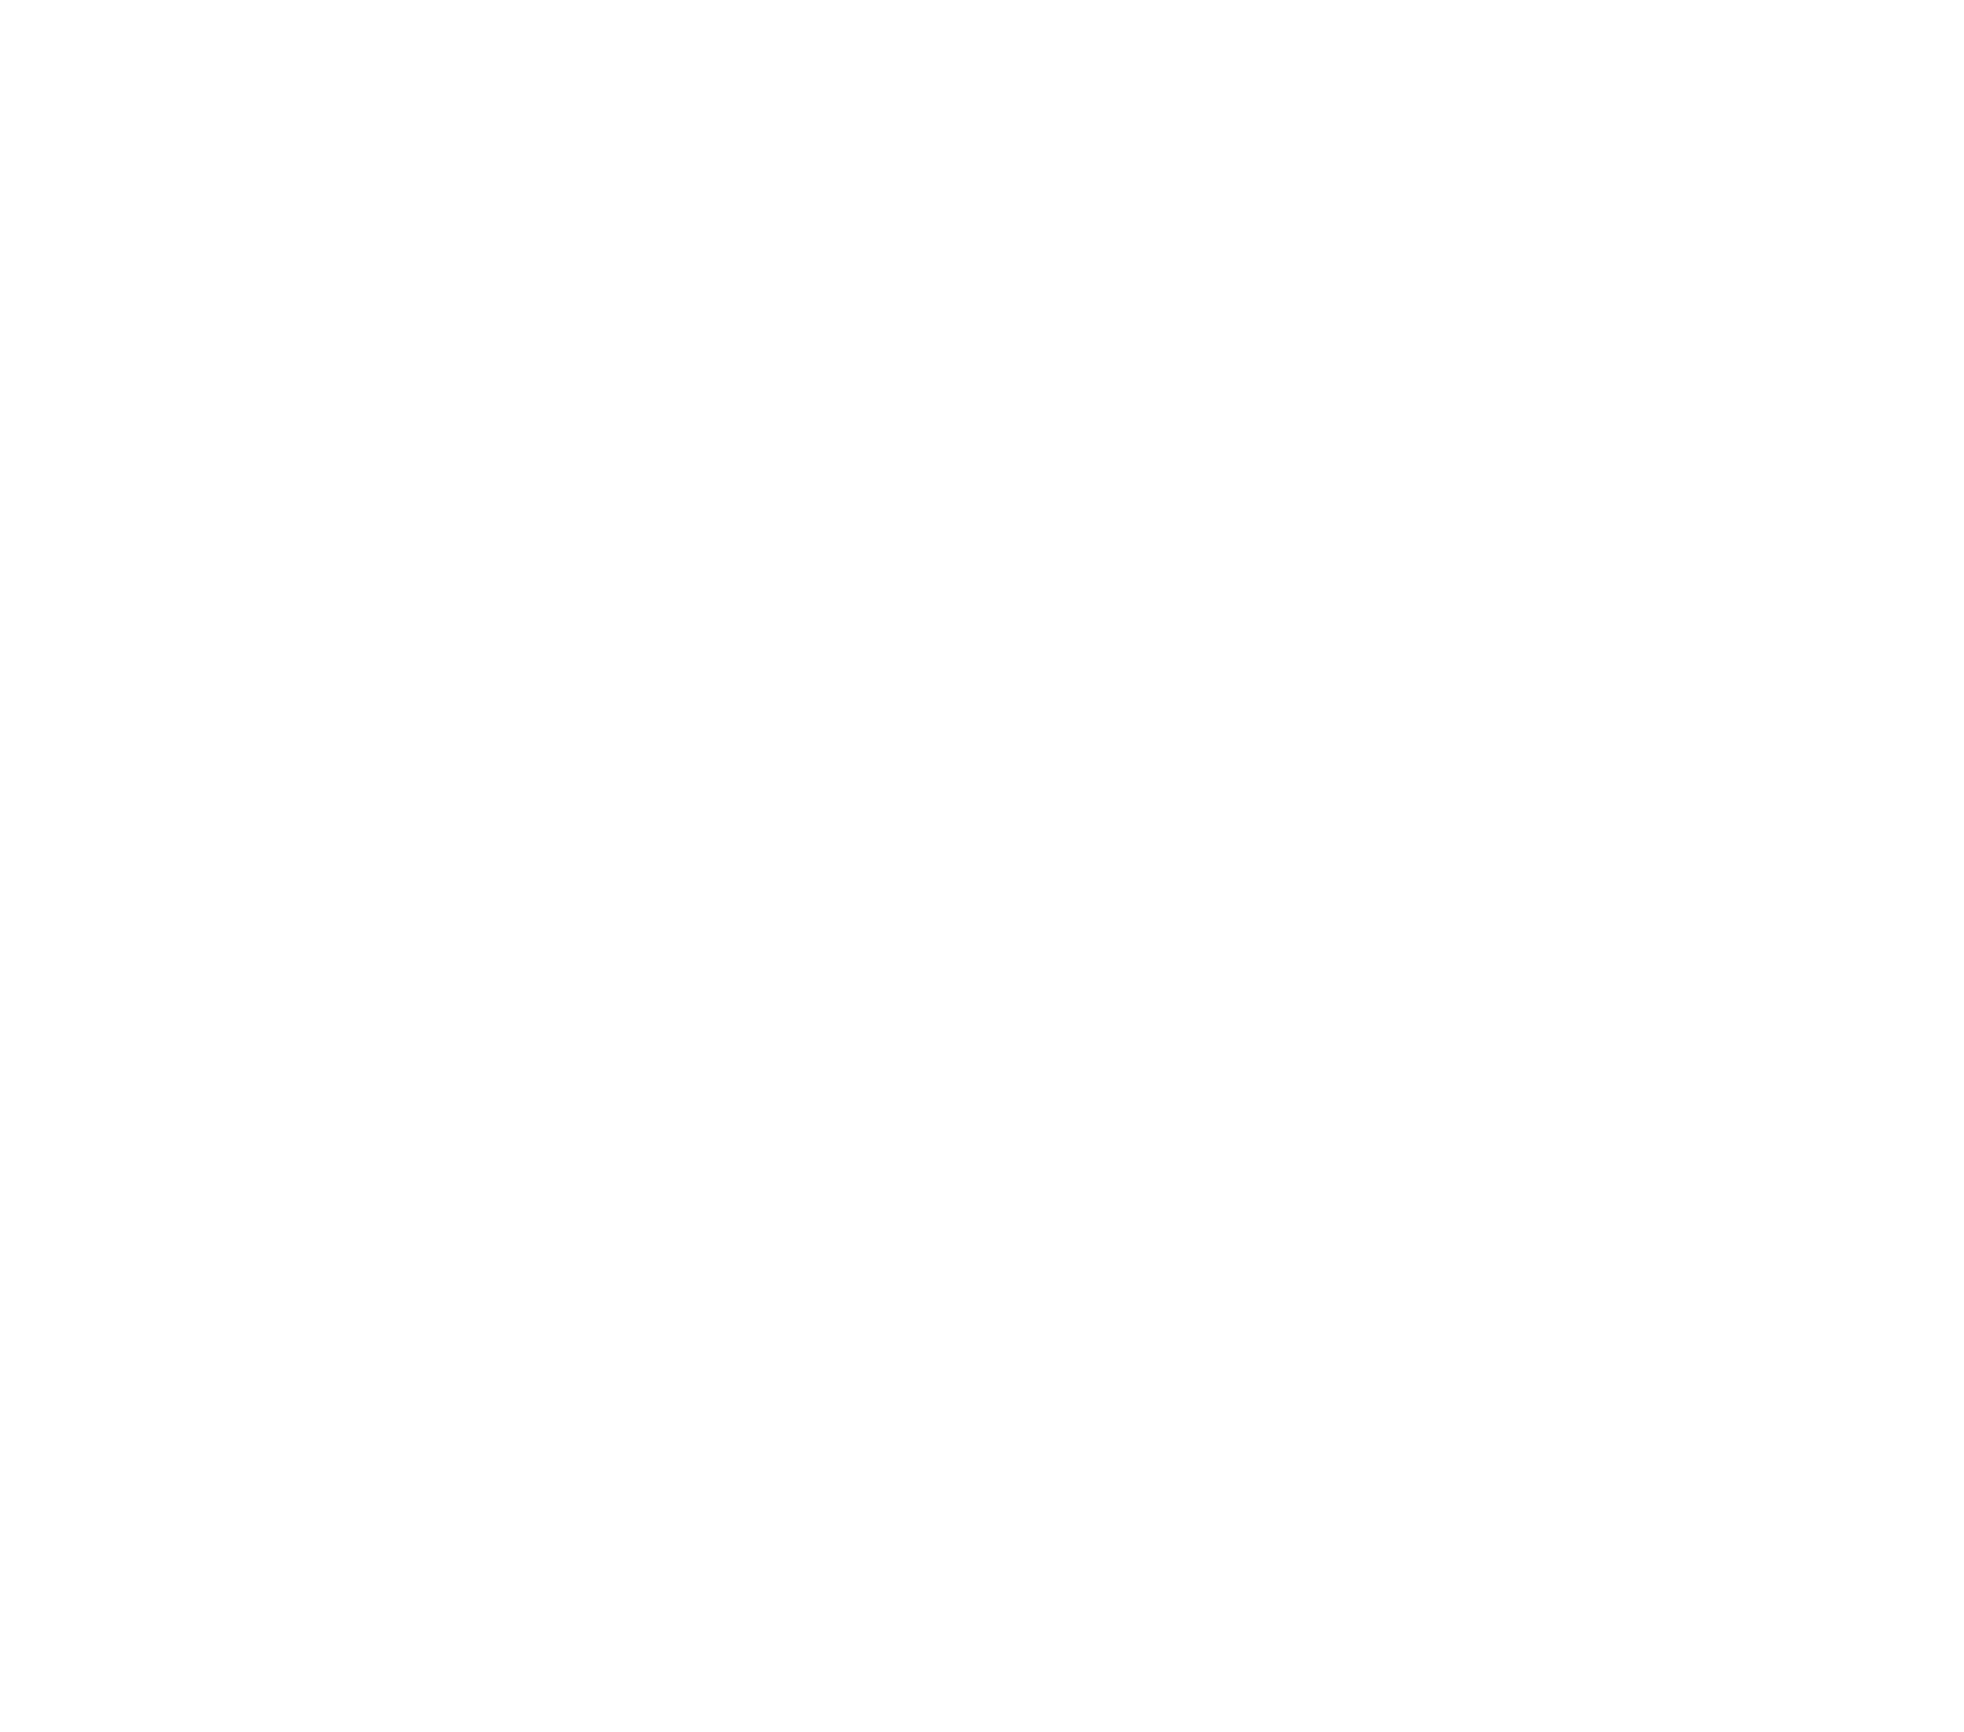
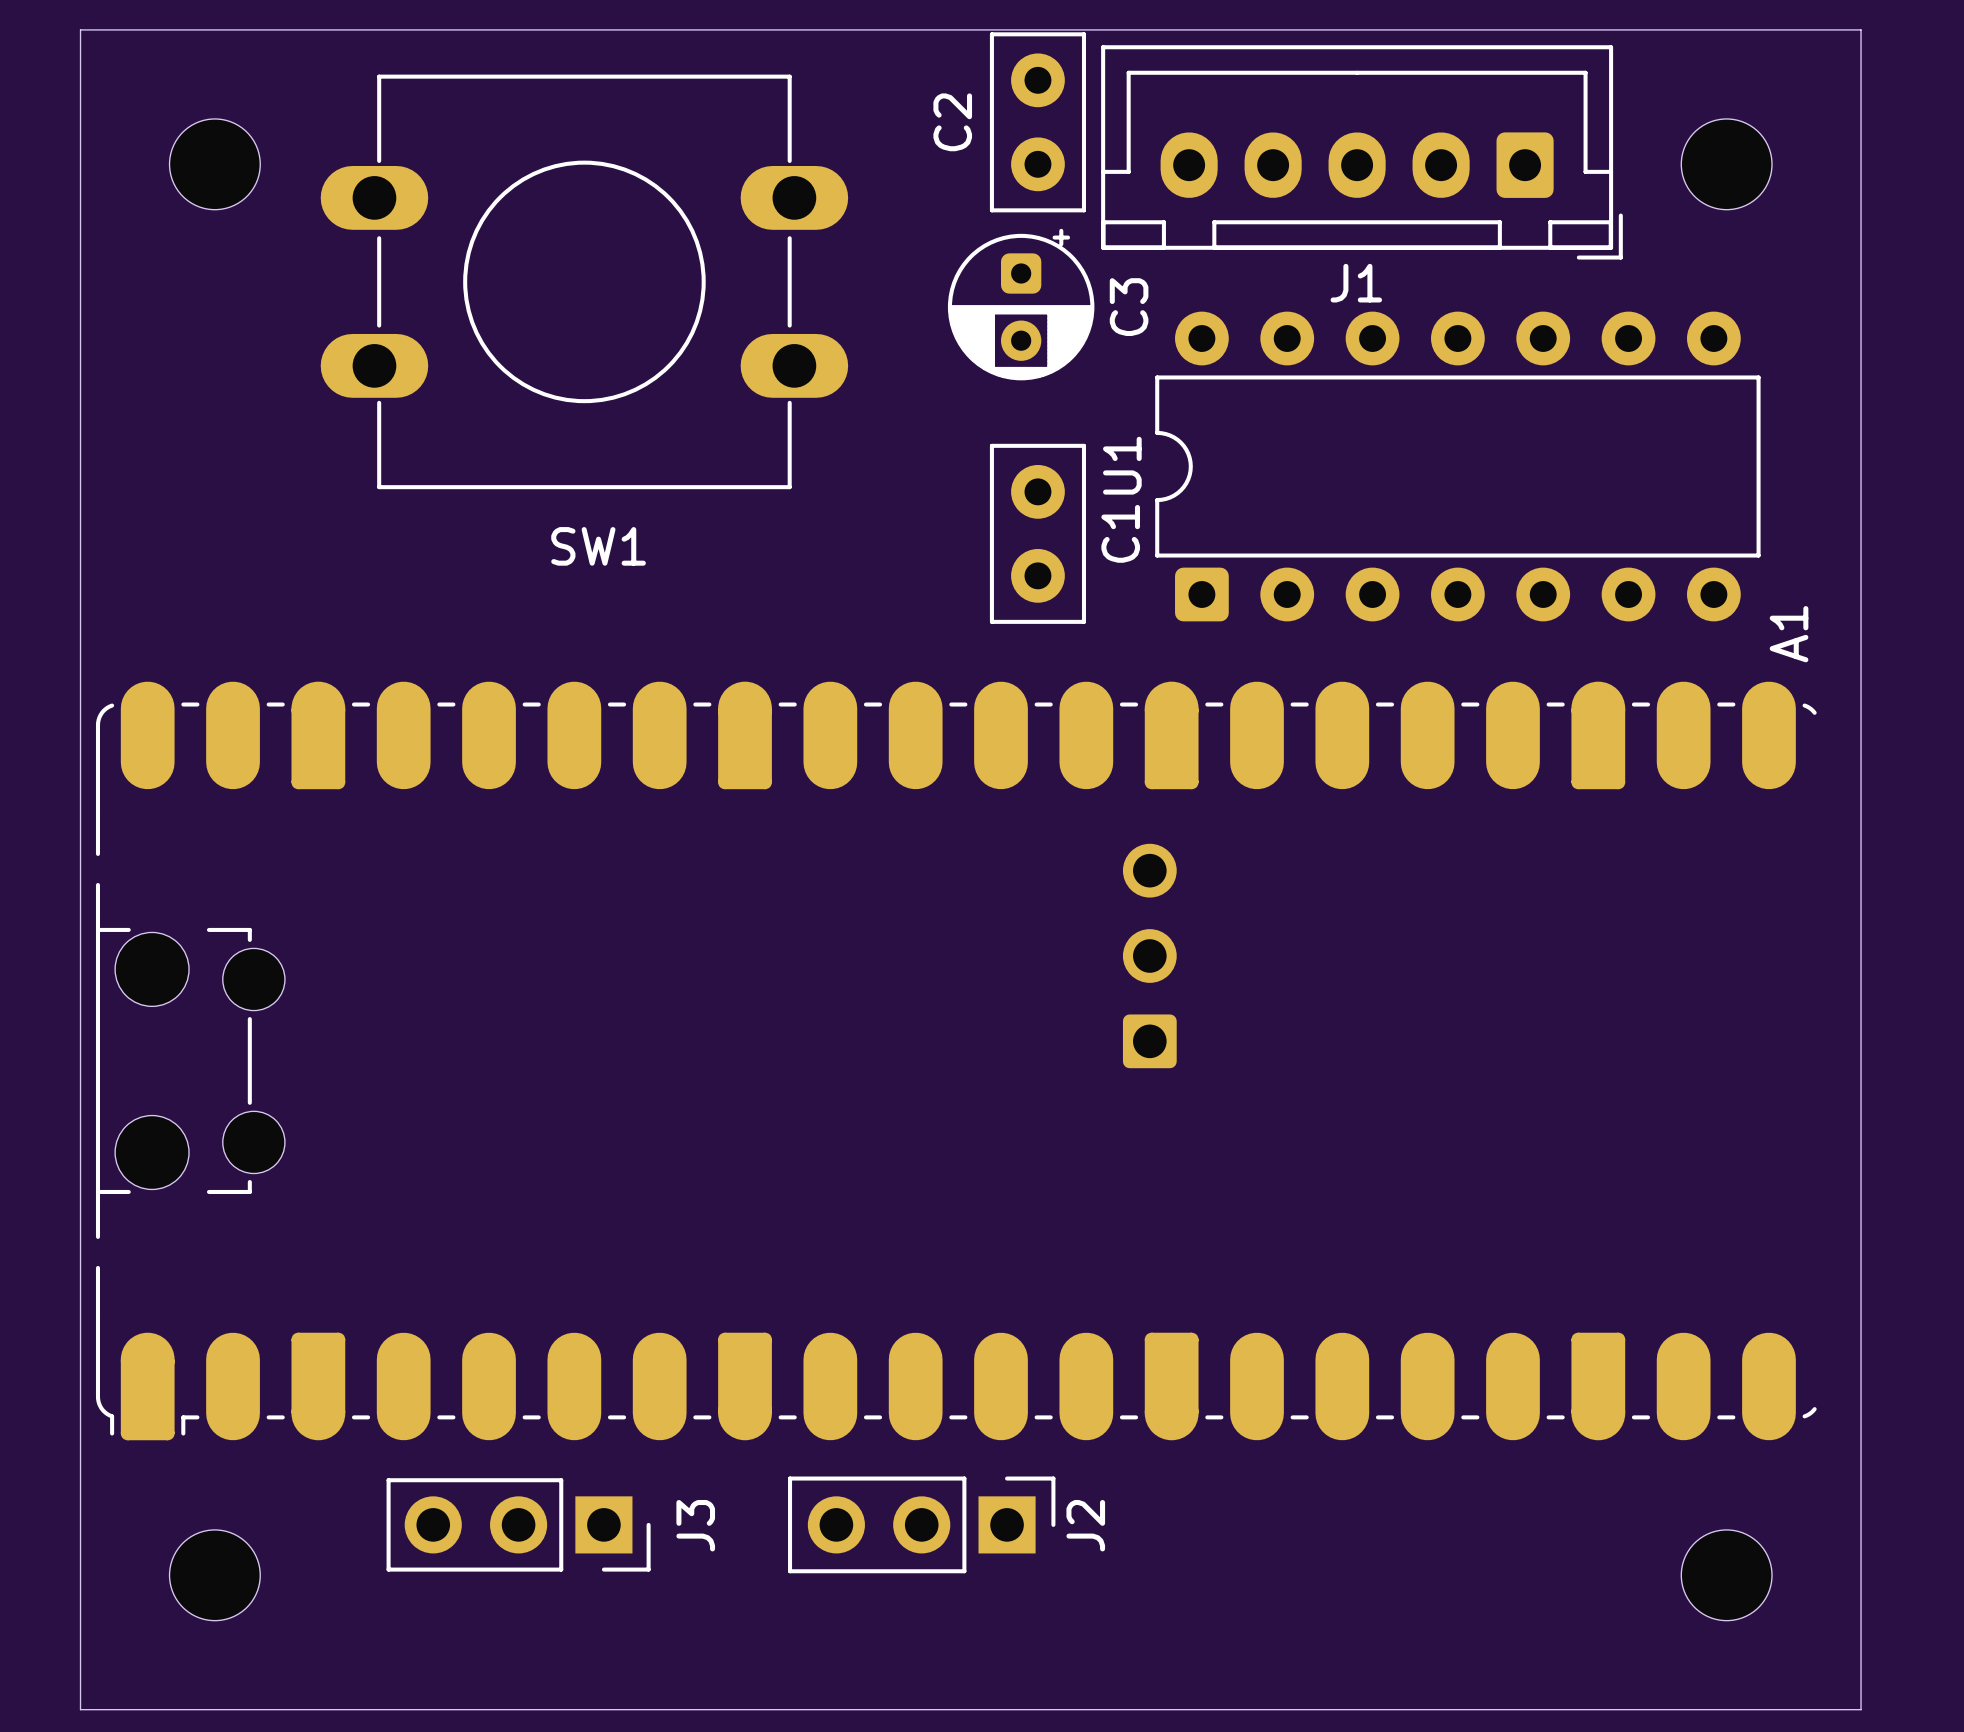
board edge: none -> (80, 29) (1861, 29) (1861, 1709) (80, 1709) (80, 29)
C2: none -> (1037, 122)
J1: none -> (1361, 152)
part: none -> (214, 164)
part: none -> (1726, 164)
SW1: none -> (584, 281)
C3: none -> (1021, 304)
U1: none -> (1457, 466)
C1: none -> (1037, 533)
A1: none -> (956, 1060)
J3: none -> (518, 1524)
J2: none -> (921, 1524)
part: none -> (214, 1575)
part: none -> (1726, 1575)

